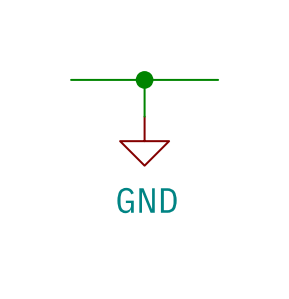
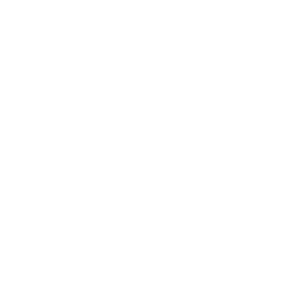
wire: (71, 79) (218, 79) -> none
wire: (144, 79) (144, 116) -> none
junction: (144, 79) -> none
power symbol: GND (144, 141) -> none

